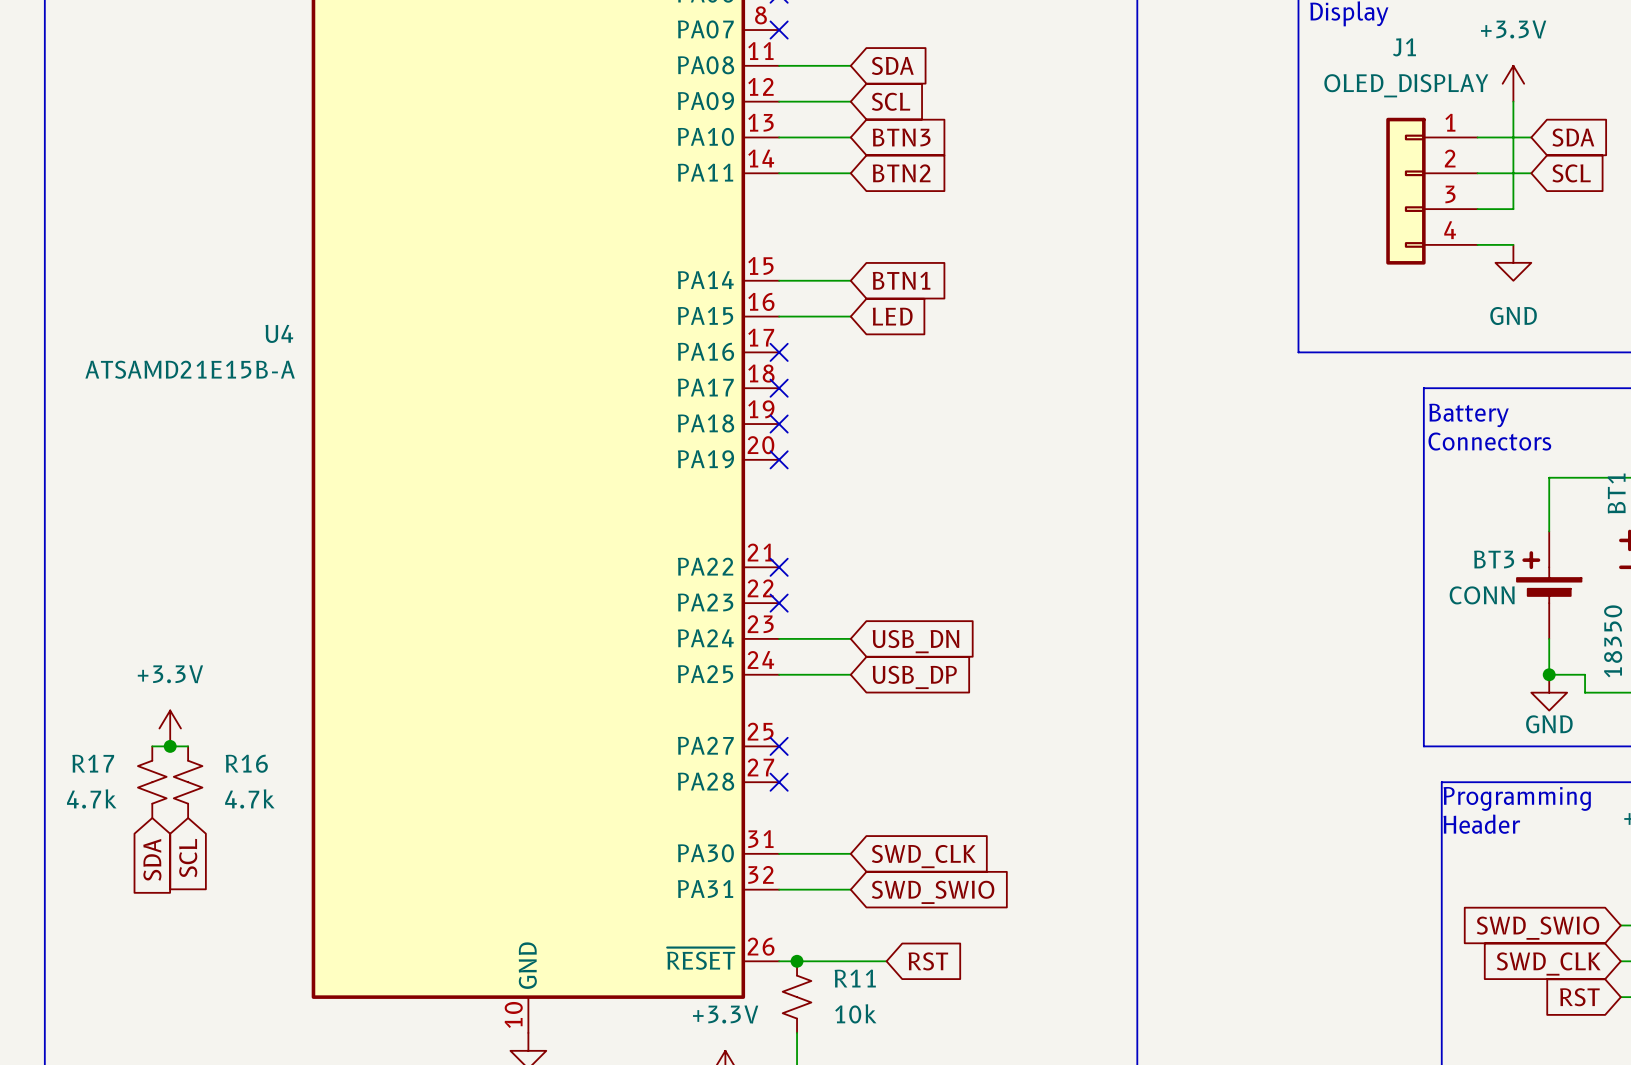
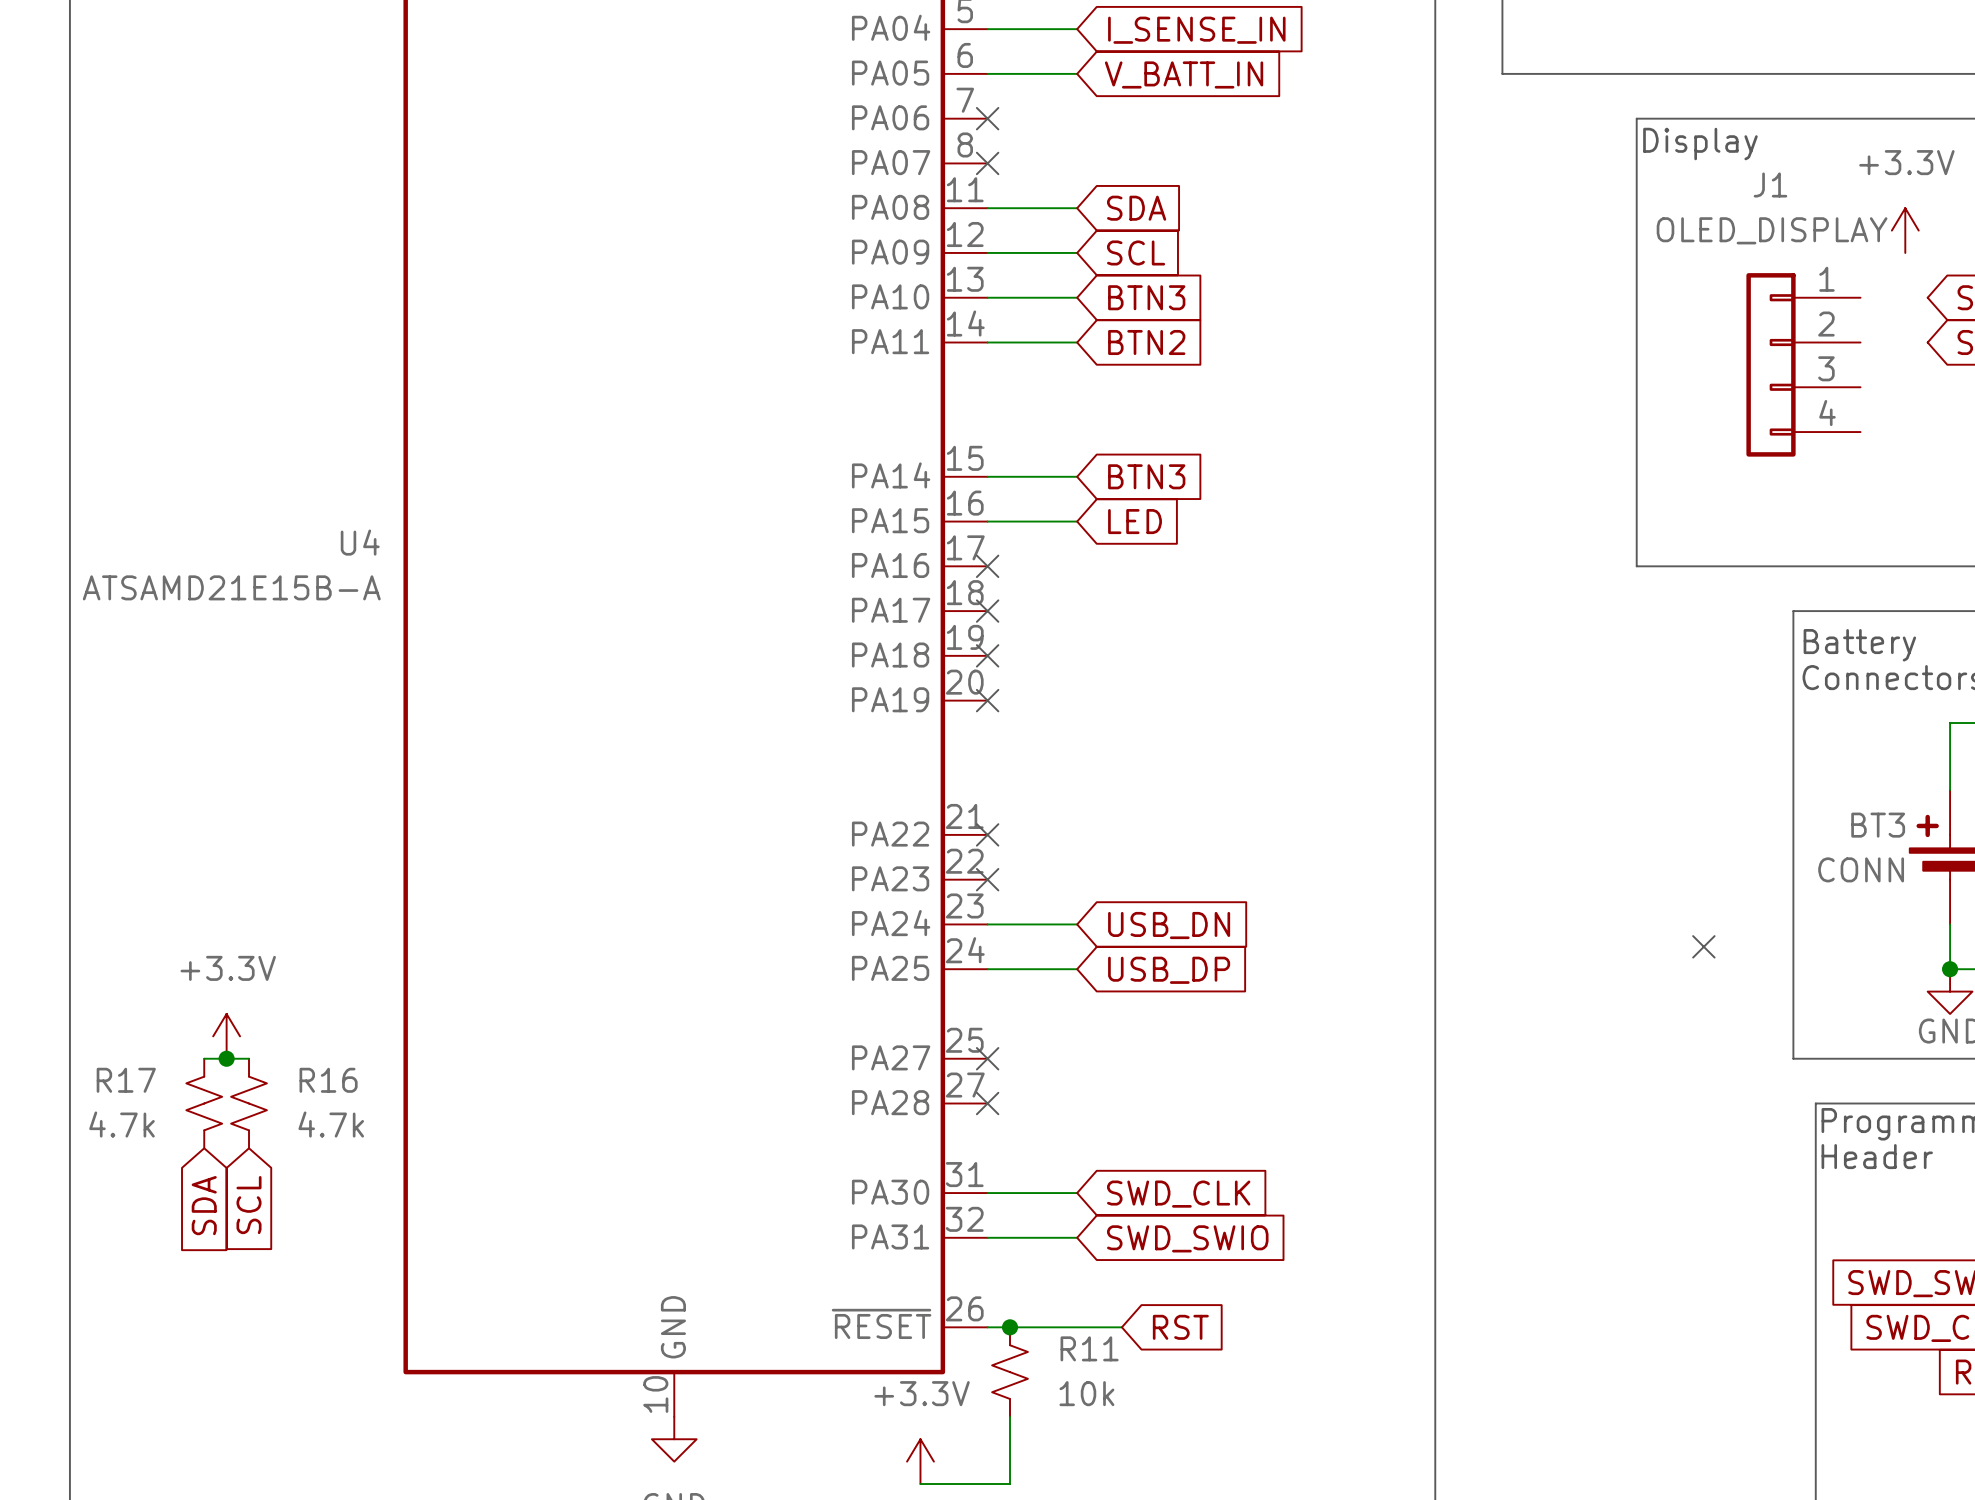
wire: (1513, 101) (1513, 209) (1477, 209) -> none
wire: (1477, 137) (1531, 137) -> none
wire: (1477, 173) (1531, 173) -> none
wire: (1477, 244) (1513, 244) -> none
power symbol: GND (1513, 262) -> none
global label: BTN1 (901, 280) -> BTN3 (1146, 476)
no-connect mark: none -> (1703, 946)

